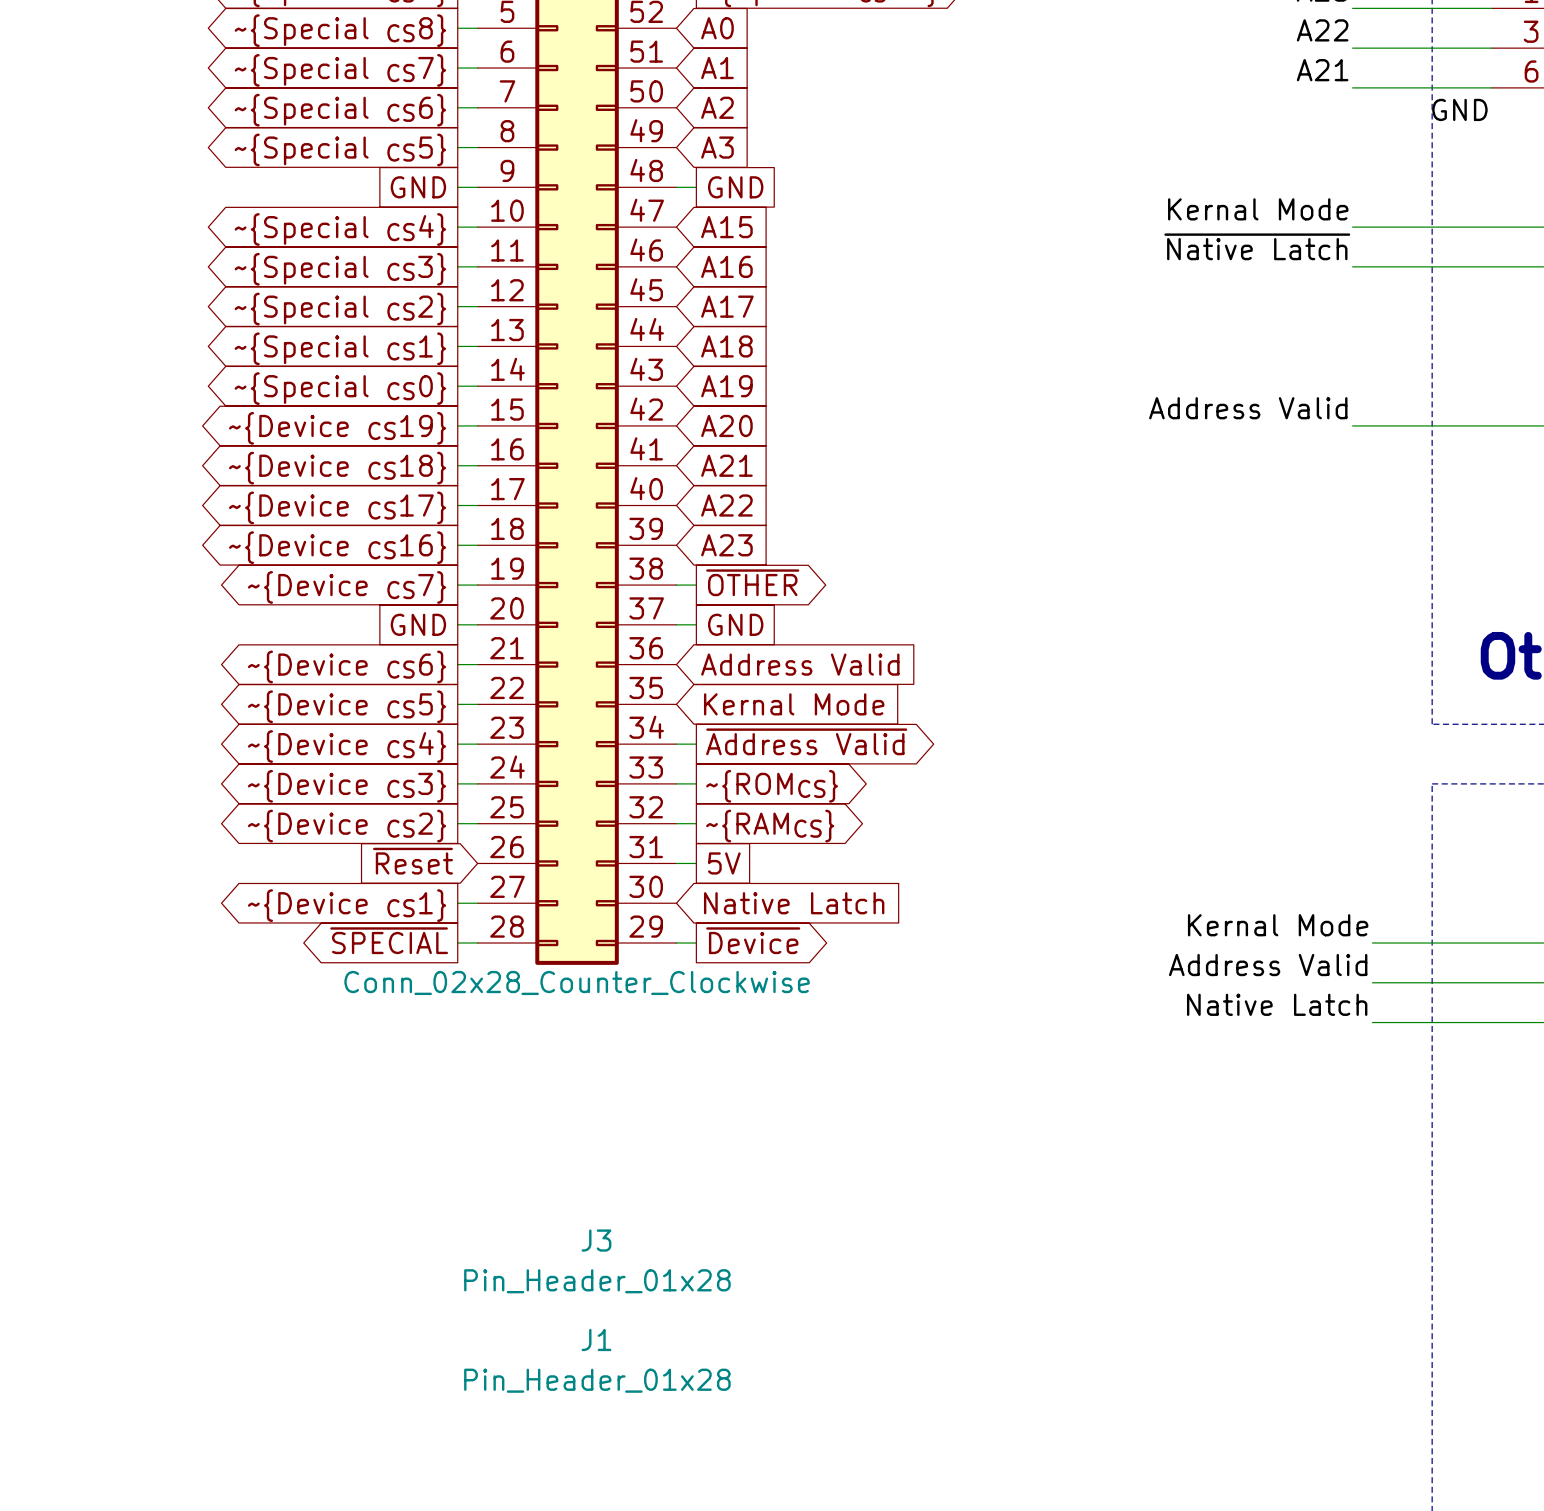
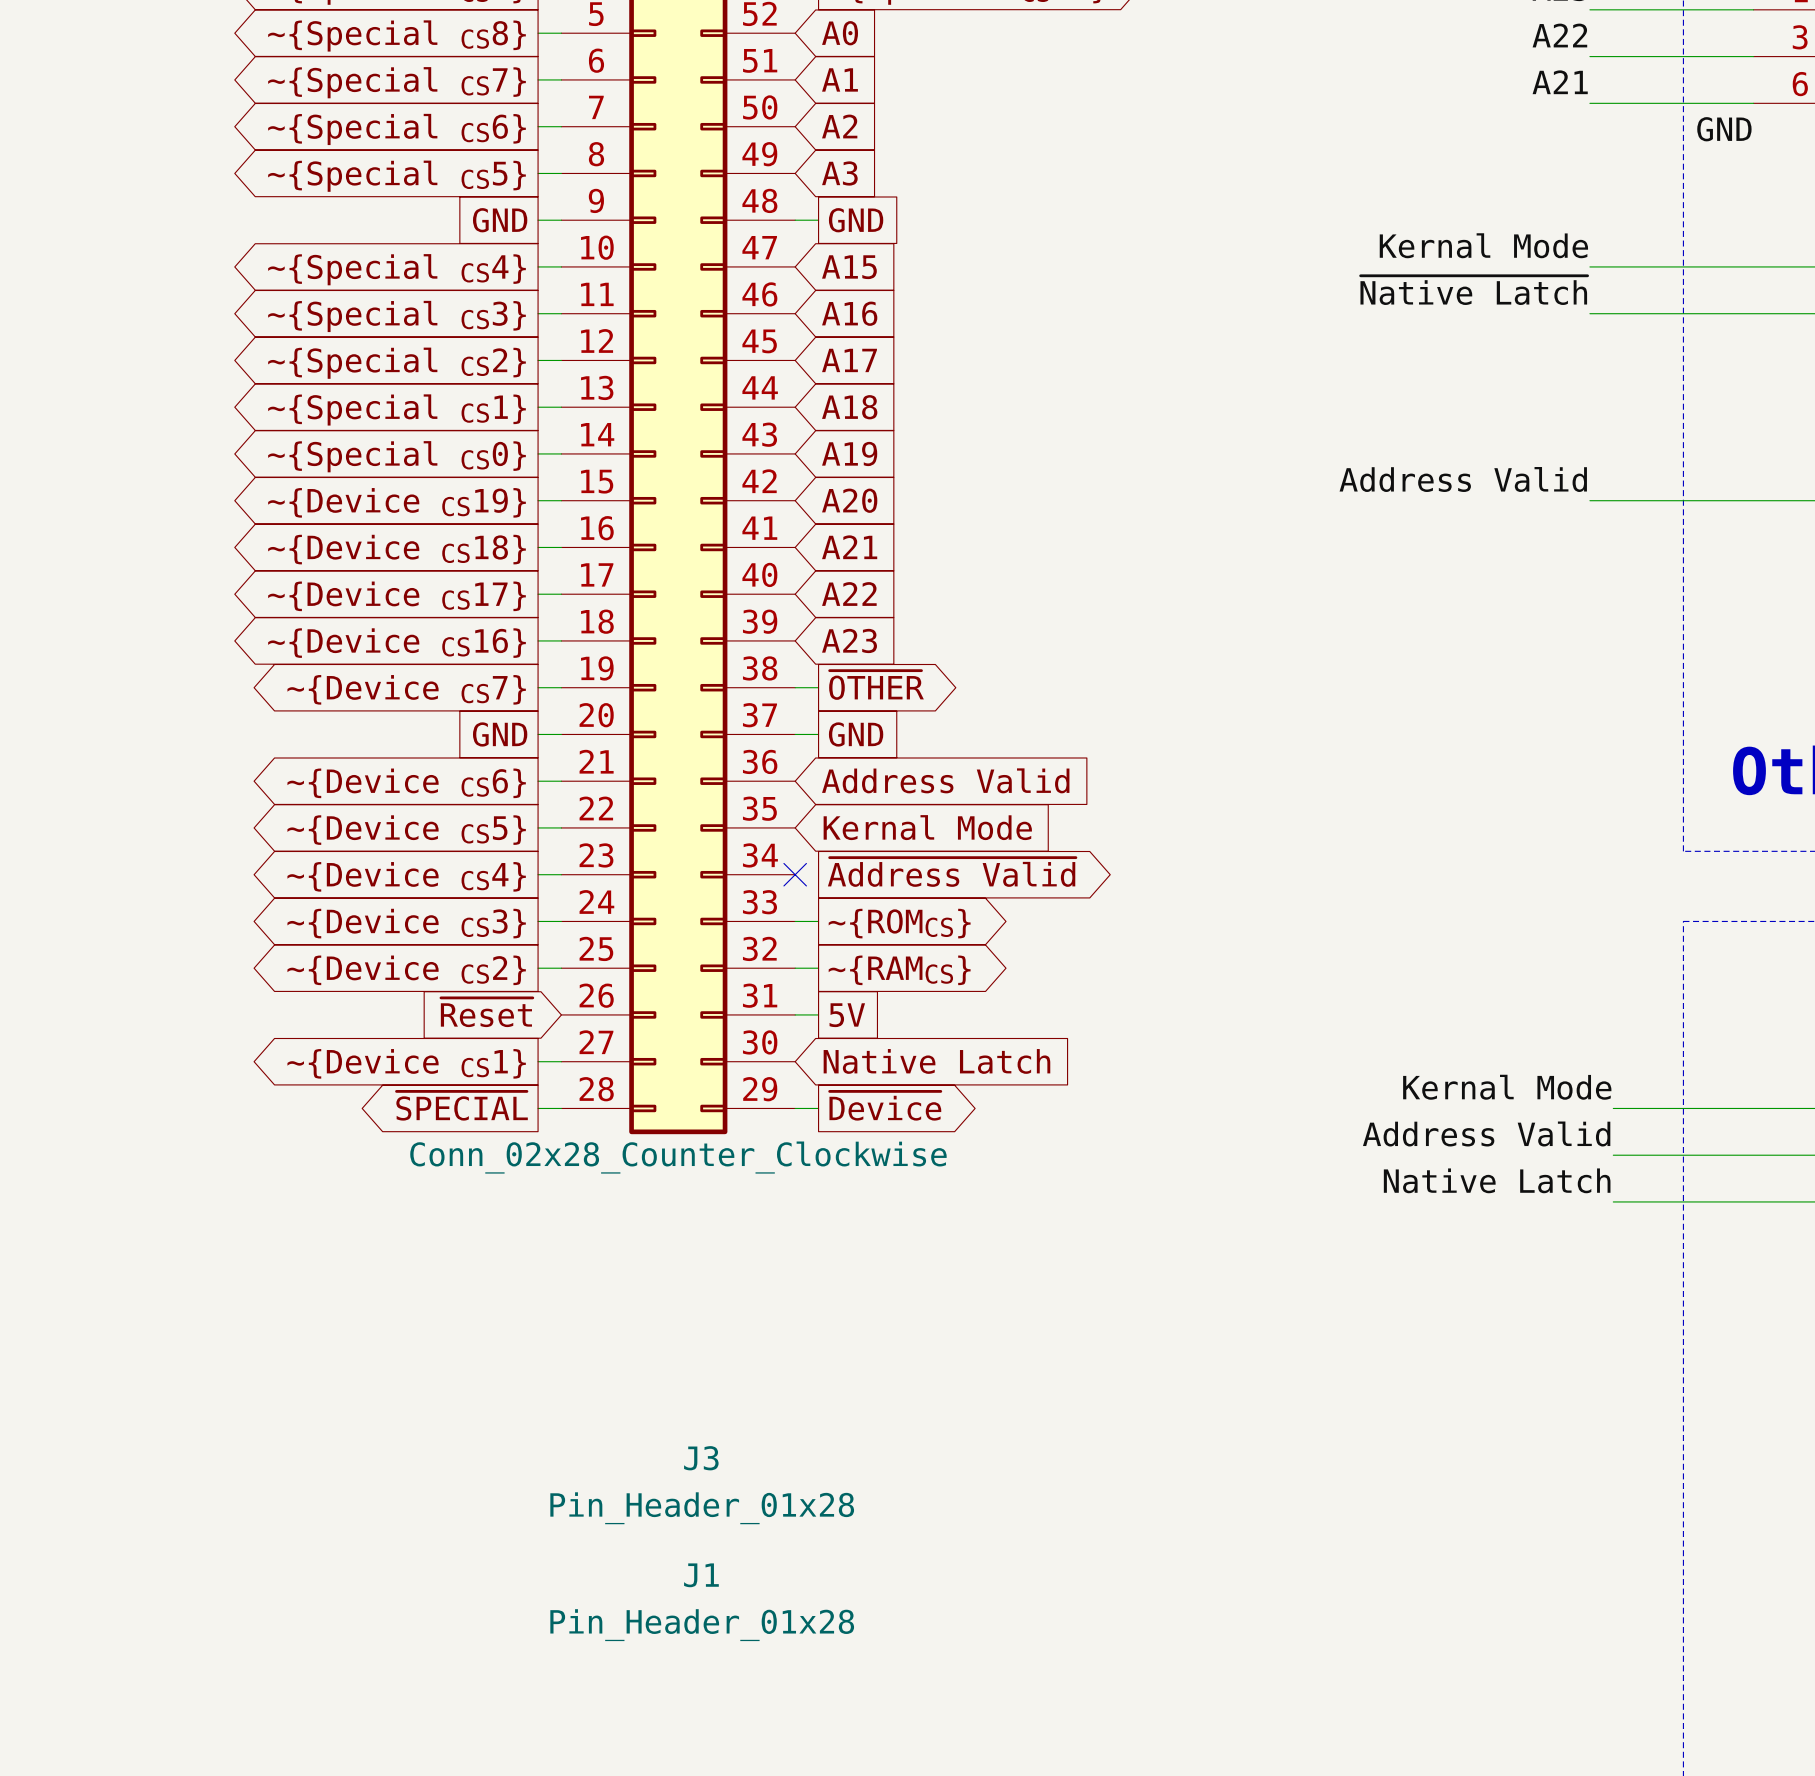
wire: (676, 744) (696, 744) -> none
no-connect mark: none -> (795, 874)

